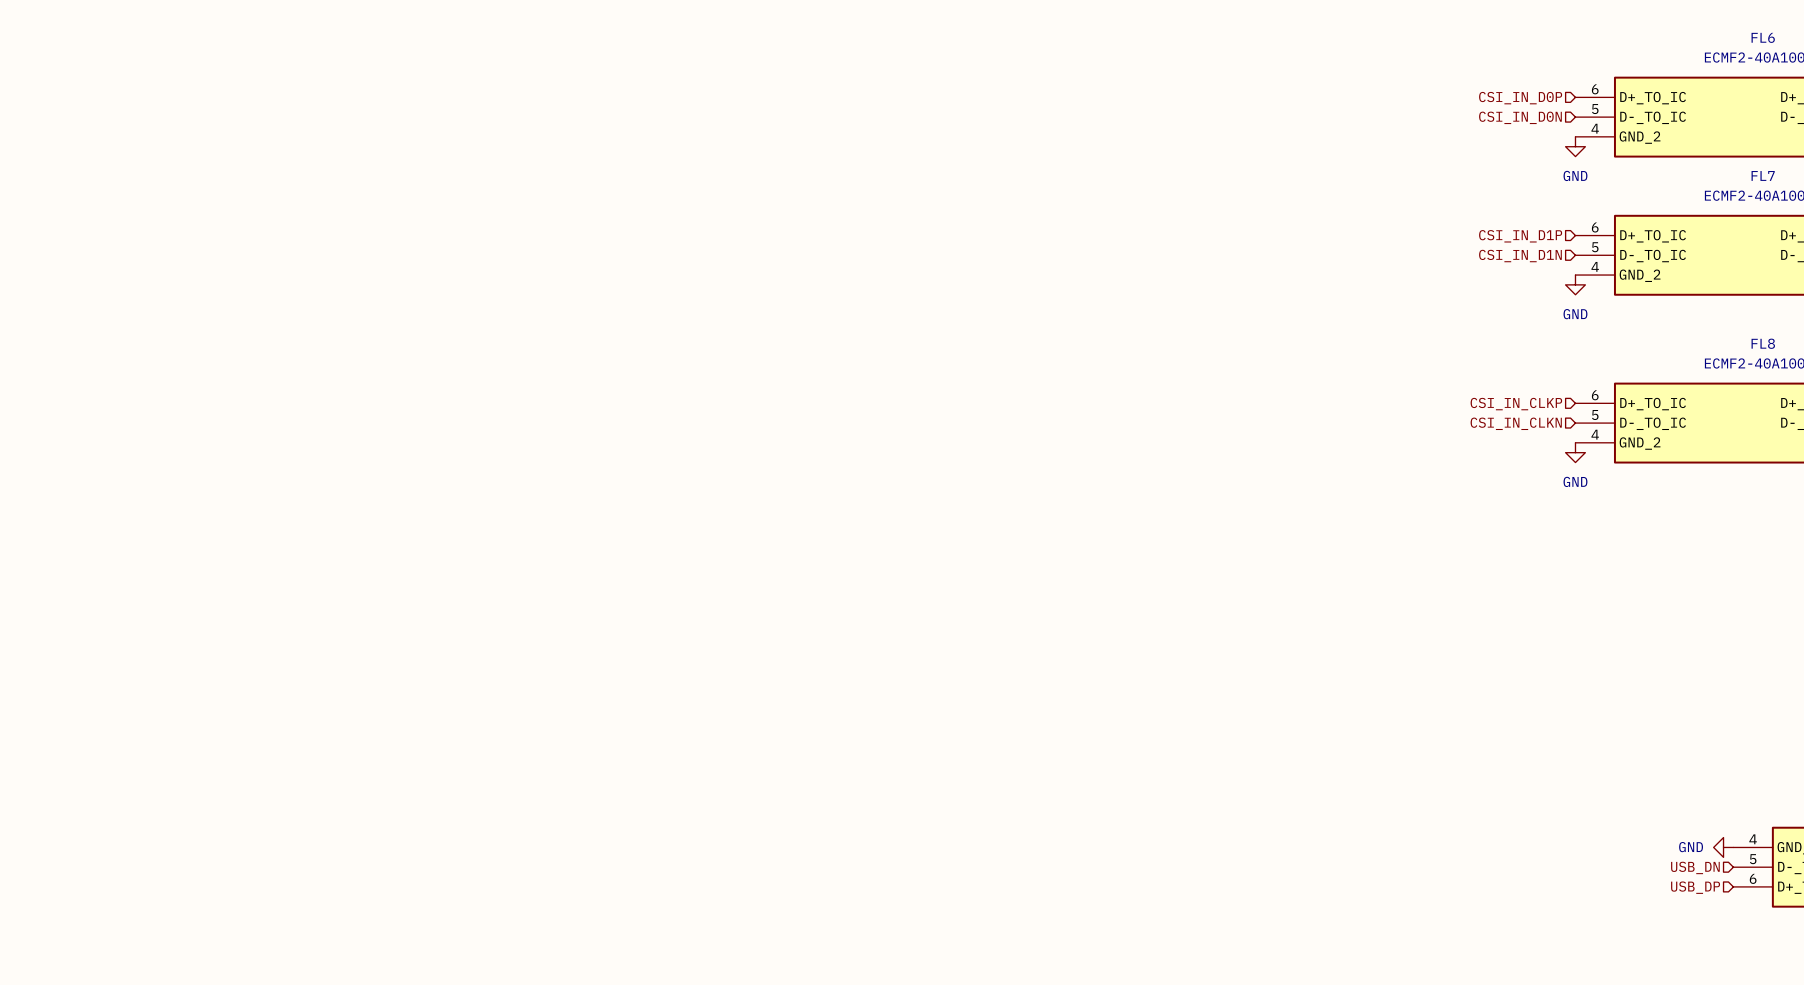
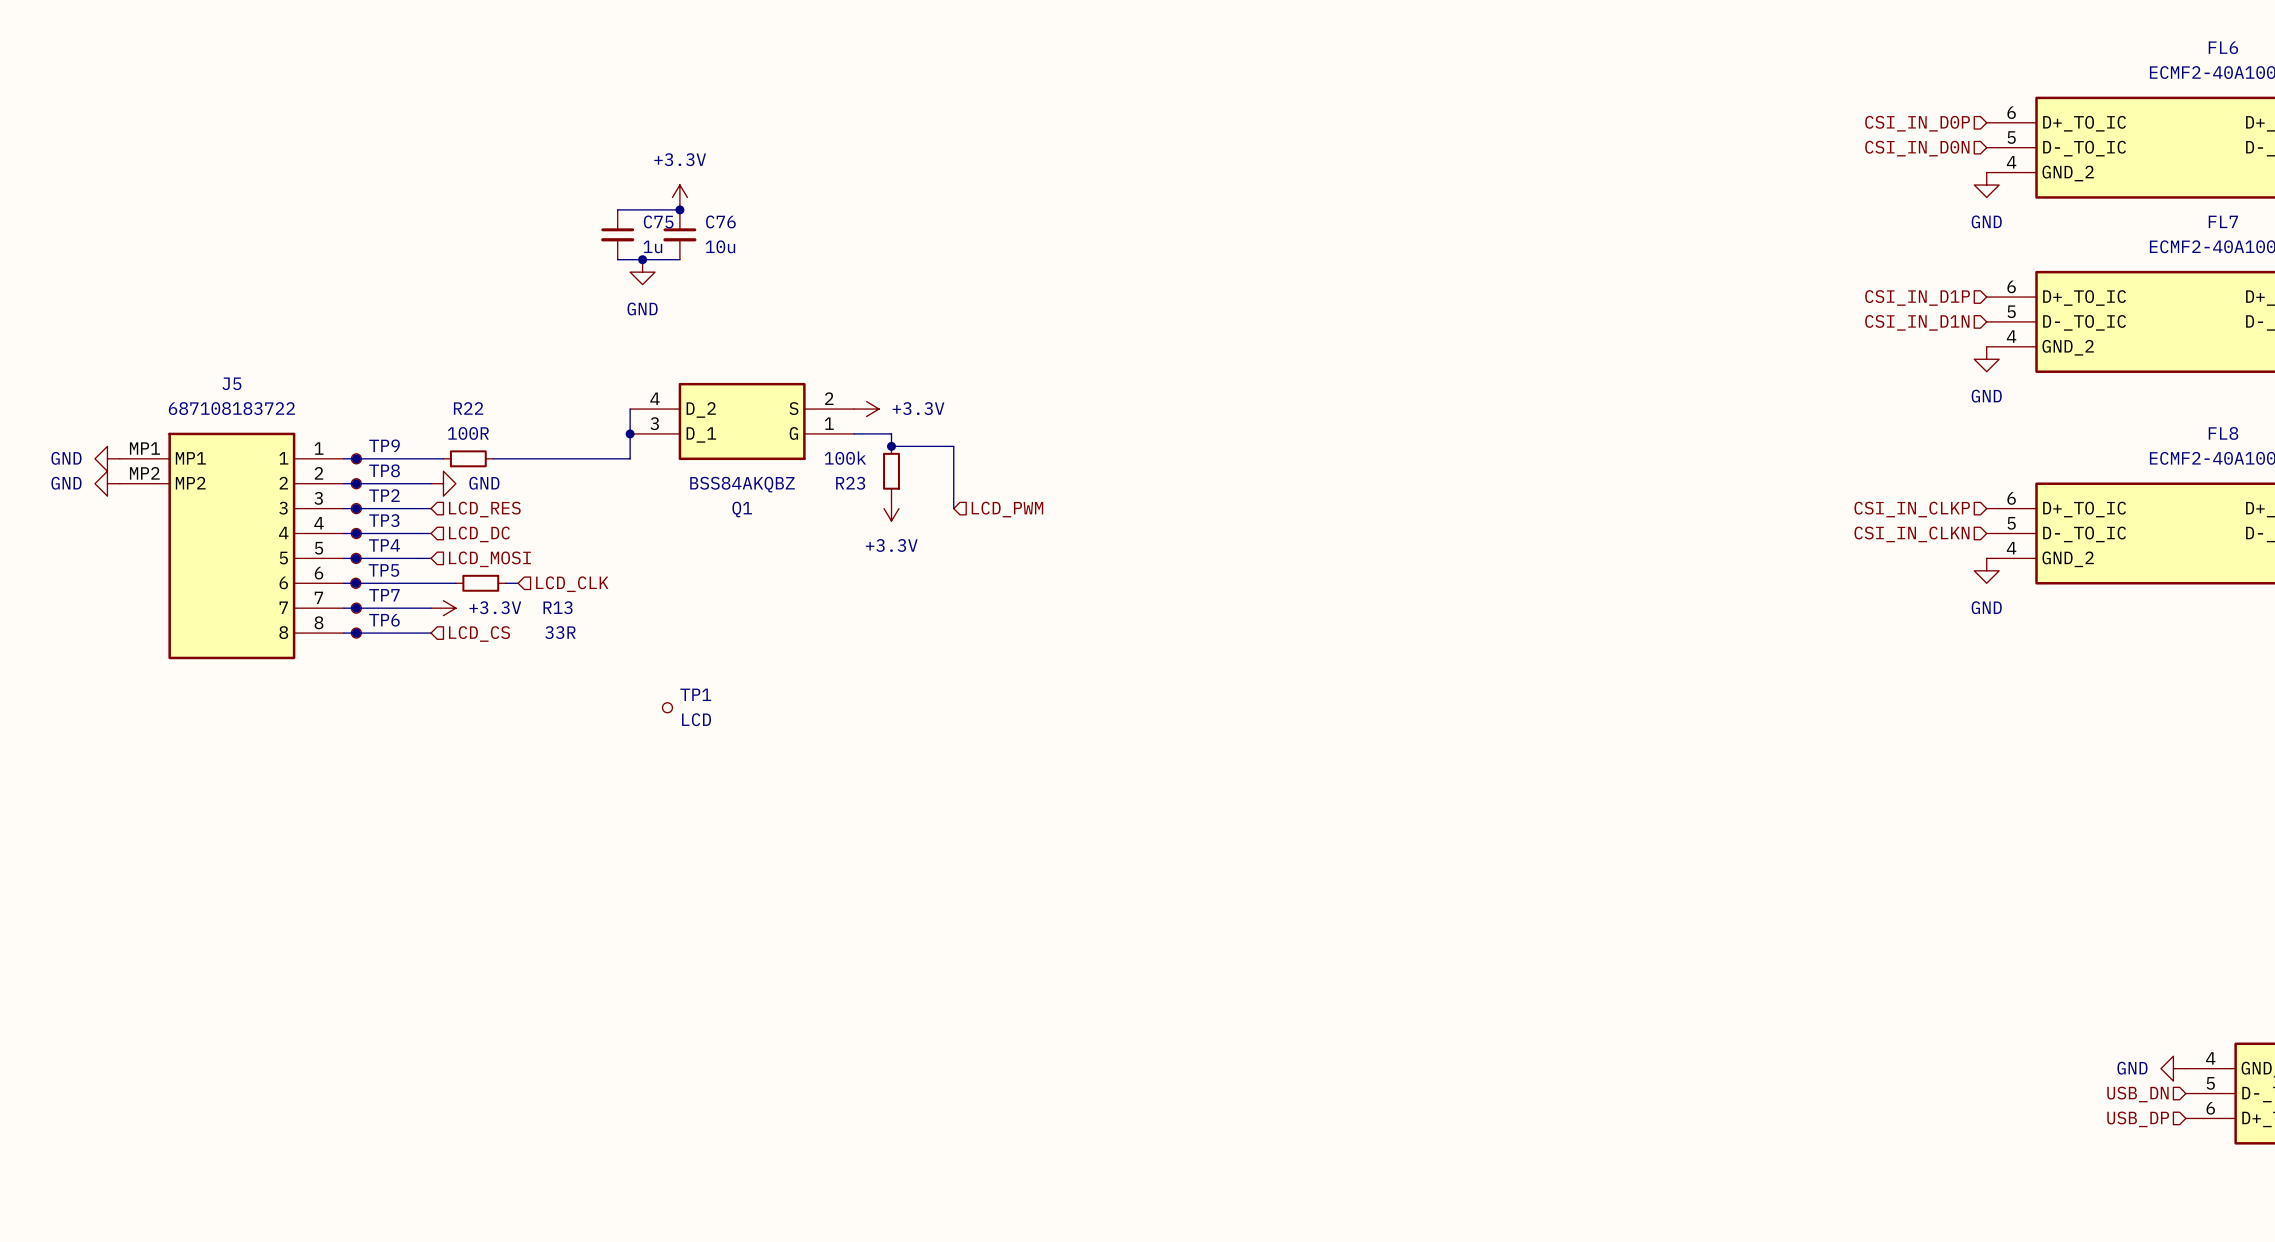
power symbol: none -> +3.3V (679, 197)
wire: none -> (617, 209) (679, 209)
junction: none -> (679, 209)
C75: none -> 1u (617, 234)
C76: none -> 10u (679, 234)
wire: none -> (617, 259) (679, 259)
junction: none -> (642, 259)
power symbol: none -> GND (642, 272)
wire: none -> (630, 409) (630, 458) (493, 458)
power symbol: none -> +3.3V (866, 409)
Q1: none -> BSS84AKQBZ (742, 421)
junction: none -> (630, 433)
wire: none -> (854, 433) (891, 433) (891, 446) (953, 446) (953, 508)
junction: none -> (891, 446)
power symbol: none -> GND (107, 458)
wire: none -> (343, 458) (443, 458)
junction: none -> (356, 458)
TP9: none -> (356, 458)
R22: none -> 100R (468, 458)
R23: none -> 100k (891, 471)
power symbol: none -> GND (107, 483)
wire: none -> (343, 483) (431, 483)
junction: none -> (356, 483)
TP8: none -> (356, 483)
power symbol: none -> GND (443, 483)
wire: none -> (343, 508) (431, 508)
junction: none -> (356, 508)
TP2: none -> (356, 508)
power symbol: none -> +3.3V (891, 508)
hierarchical label: none -> LCD_RES (484, 509)
hierarchical label: none -> LCD_PWM (1007, 509)
wire: none -> (343, 533) (431, 533)
junction: none -> (356, 533)
TP3: none -> (356, 533)
hierarchical label: none -> LCD_DC (479, 534)
J5: none -> 687108183722 (231, 545)
wire: none -> (343, 558) (431, 558)
junction: none -> (356, 558)
TP4: none -> (356, 558)
hierarchical label: none -> LCD_MOSI (489, 559)
wire: none -> (343, 583) (455, 583)
junction: none -> (355, 583)
TP5: none -> (355, 583)
R13: none -> 33R (480, 583)
wire: none -> (505, 583) (518, 583)
hierarchical label: none -> LCD_CLK (572, 584)
wire: none -> (343, 608) (431, 608)
junction: none -> (356, 608)
TP7: none -> (356, 608)
power symbol: none -> +3.3V (443, 608)
wire: none -> (343, 633) (431, 633)
junction: none -> (356, 633)
TP6: none -> (356, 633)
hierarchical label: none -> LCD_CS (479, 634)
TP1: none -> LCD (667, 707)

